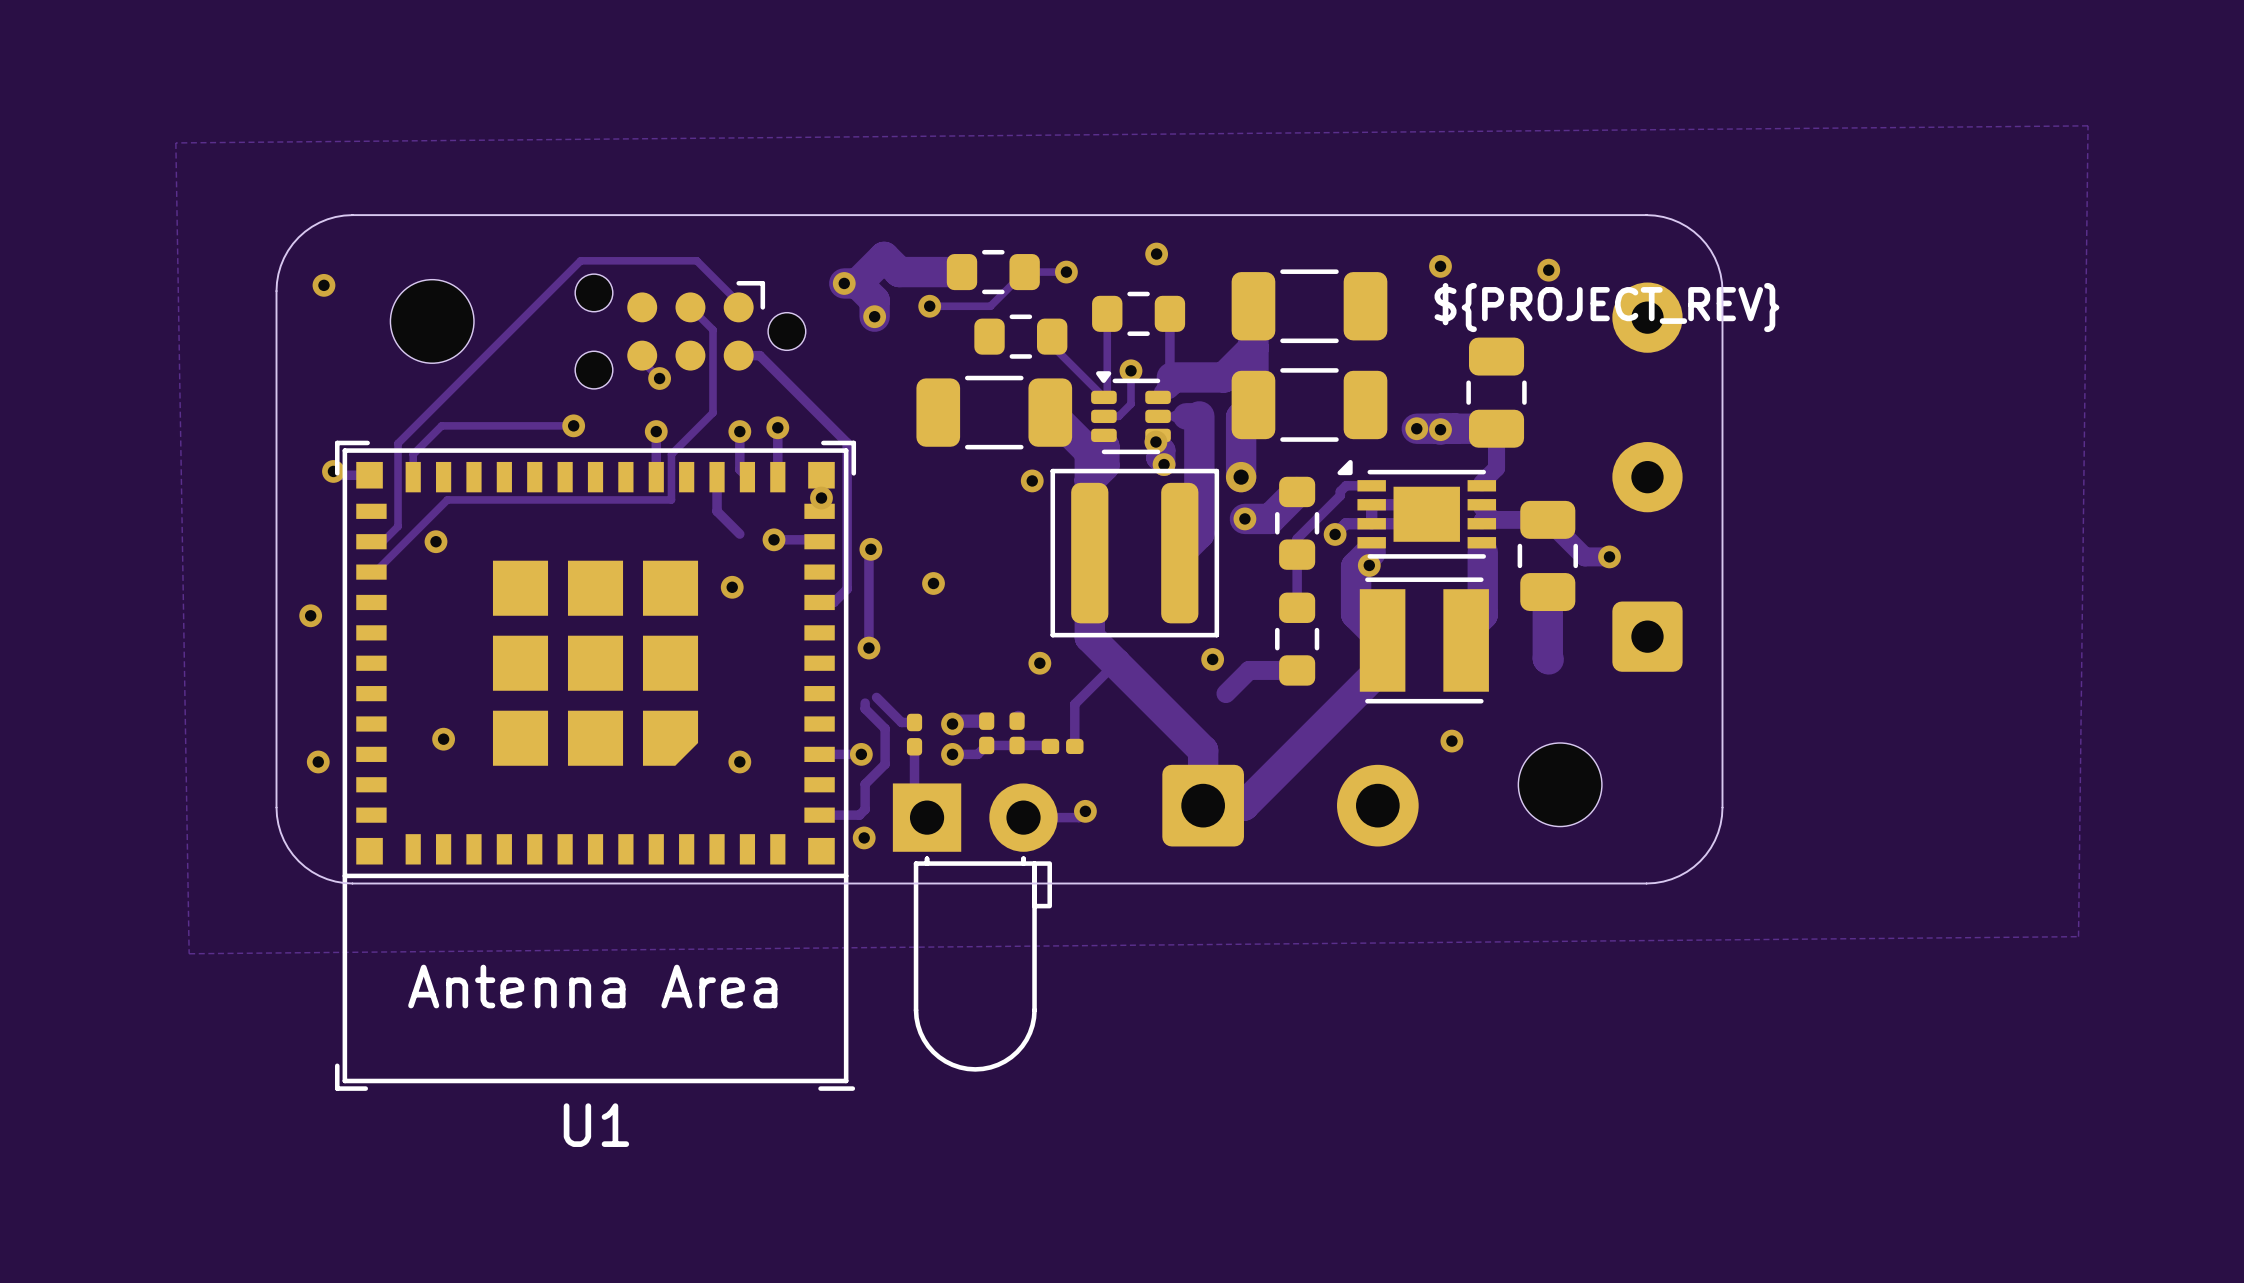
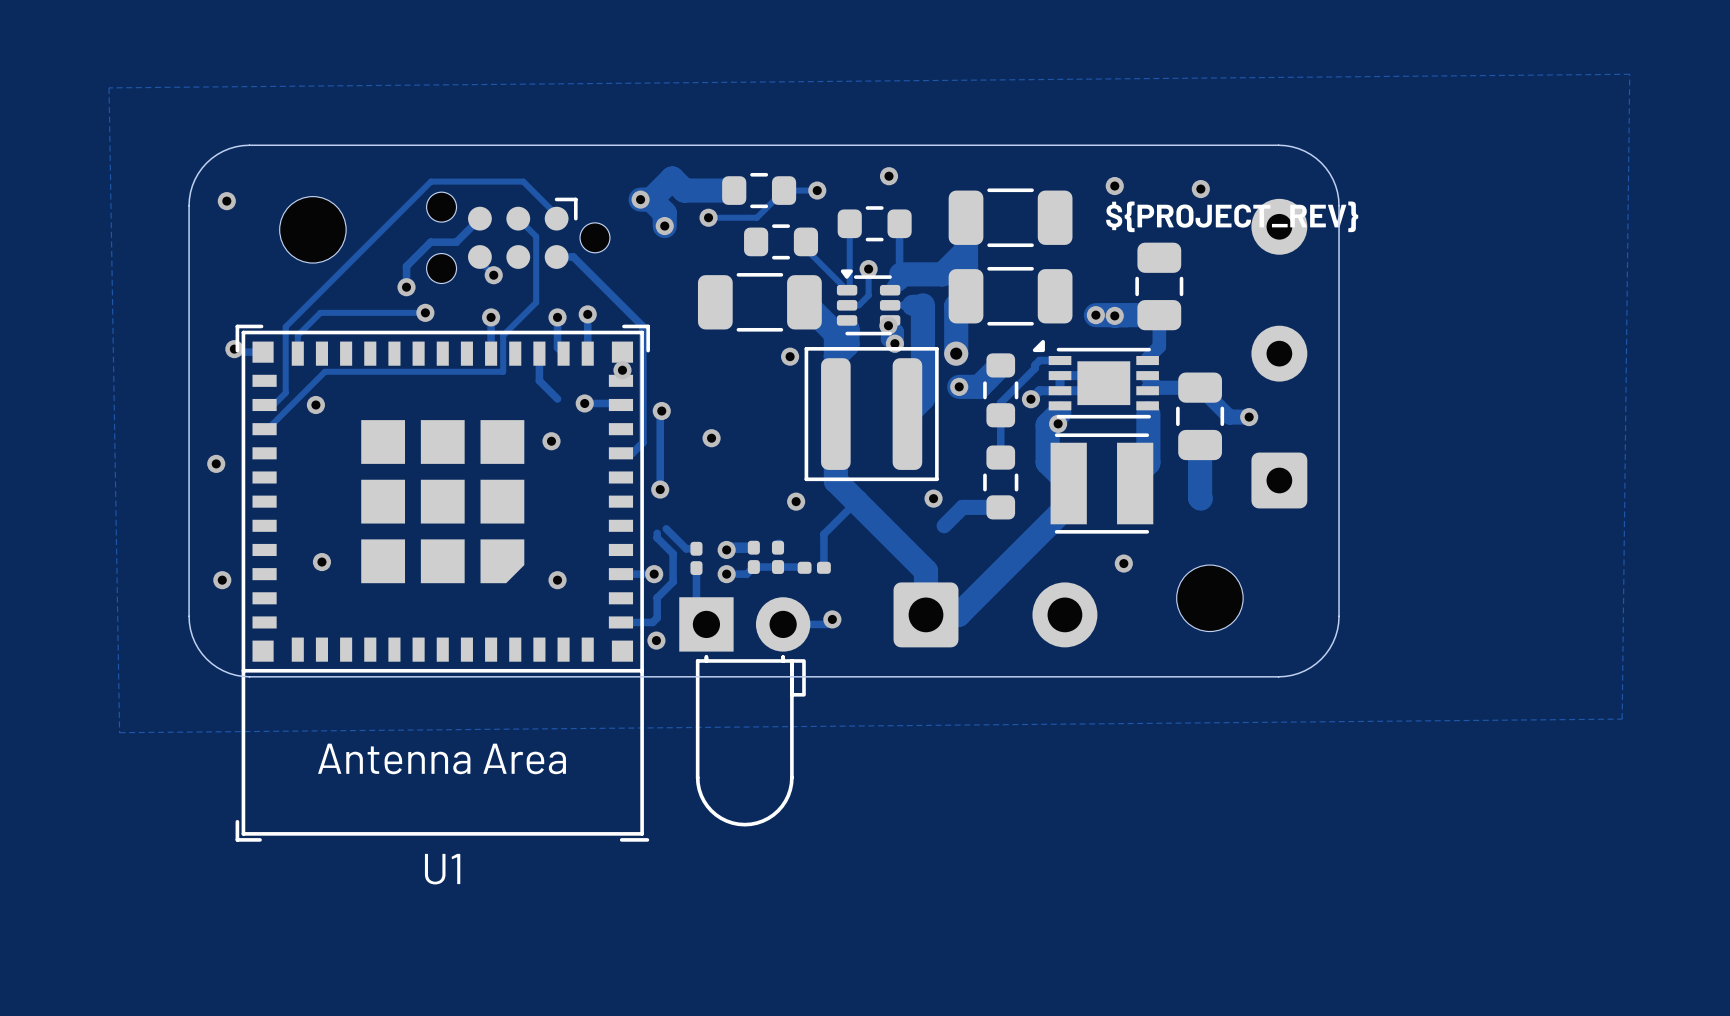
track: none -> (479, 218) (456, 242) (430, 242) (406, 266) (406, 287)
via: none -> (406, 287)

